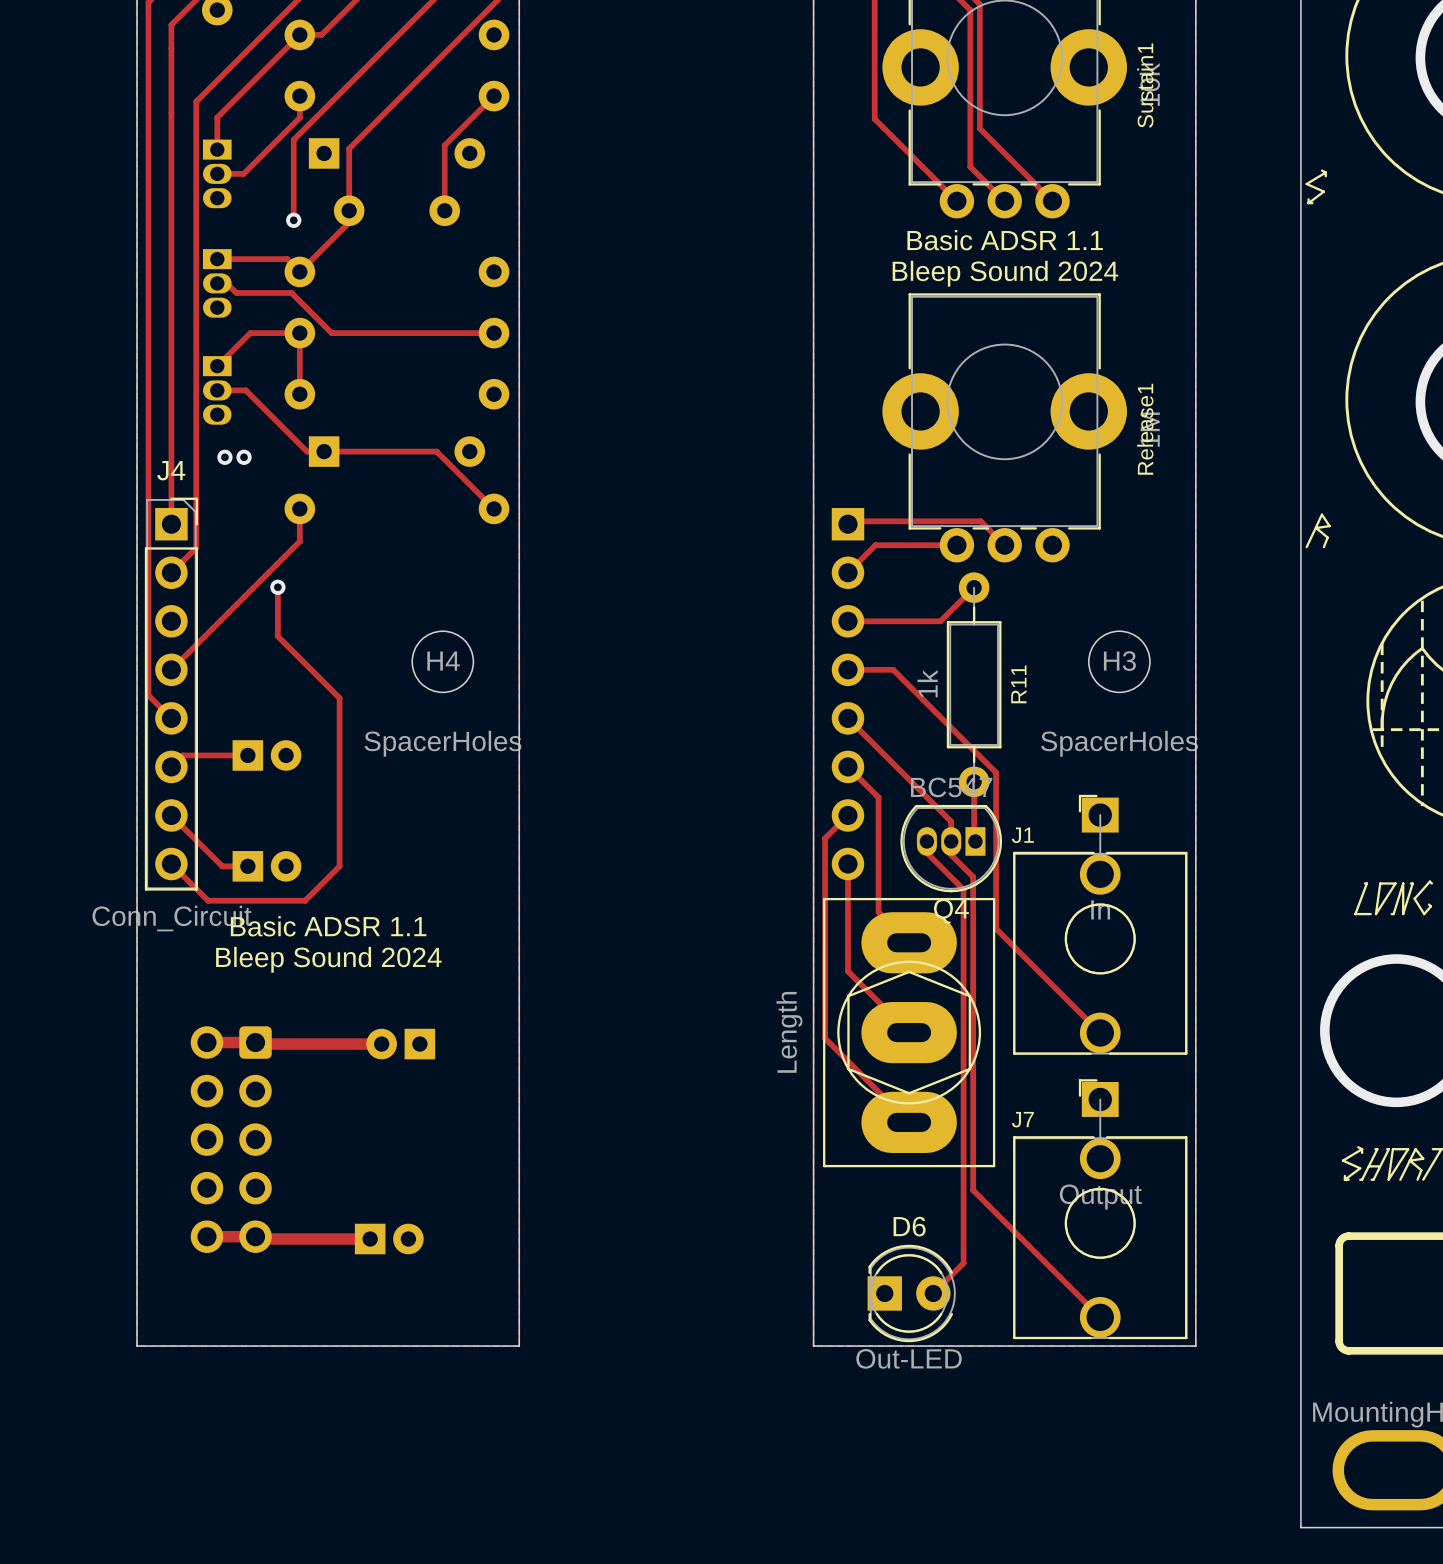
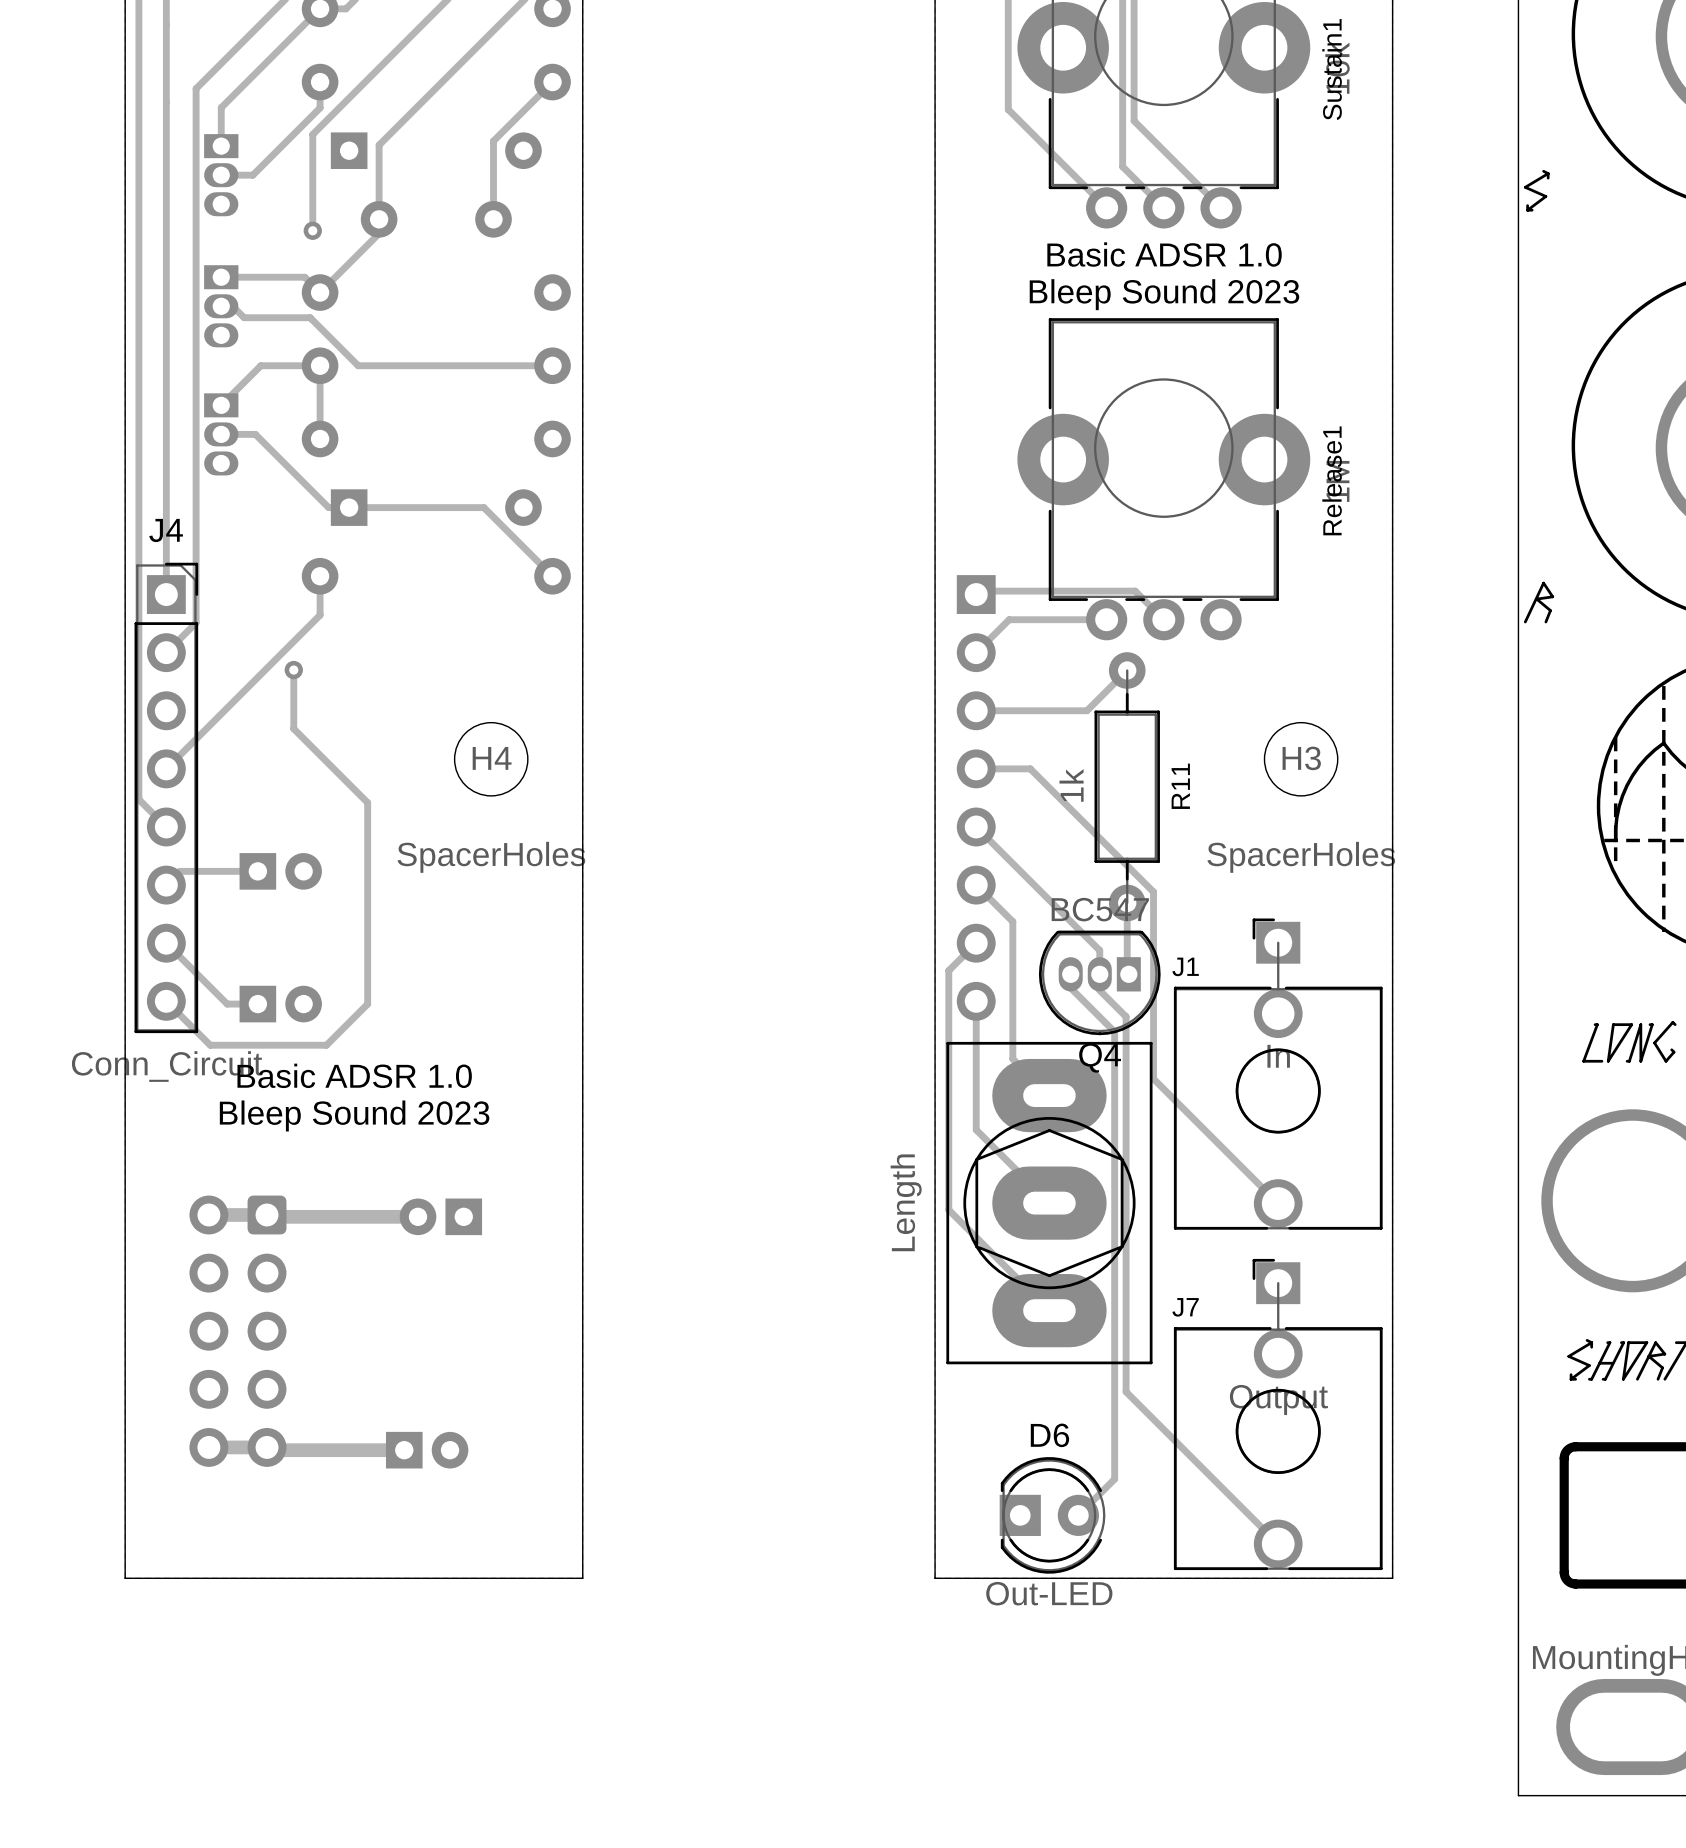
text: Basic ADSR 1.1 (1005, 240) -> Basic ADSR 1.0 (1164, 254)
text: Bleep Sound 2024 (1005, 273) -> Bleep Sound 2023 (1164, 294)
via: (224, 457) -> none
via: (244, 457) -> none
text: Basic ADSR 1.1 (328, 926) -> Basic ADSR 1.0 (354, 1075)
text: Bleep Sound 2024 (328, 959) -> Bleep Sound 2023 (354, 1115)

